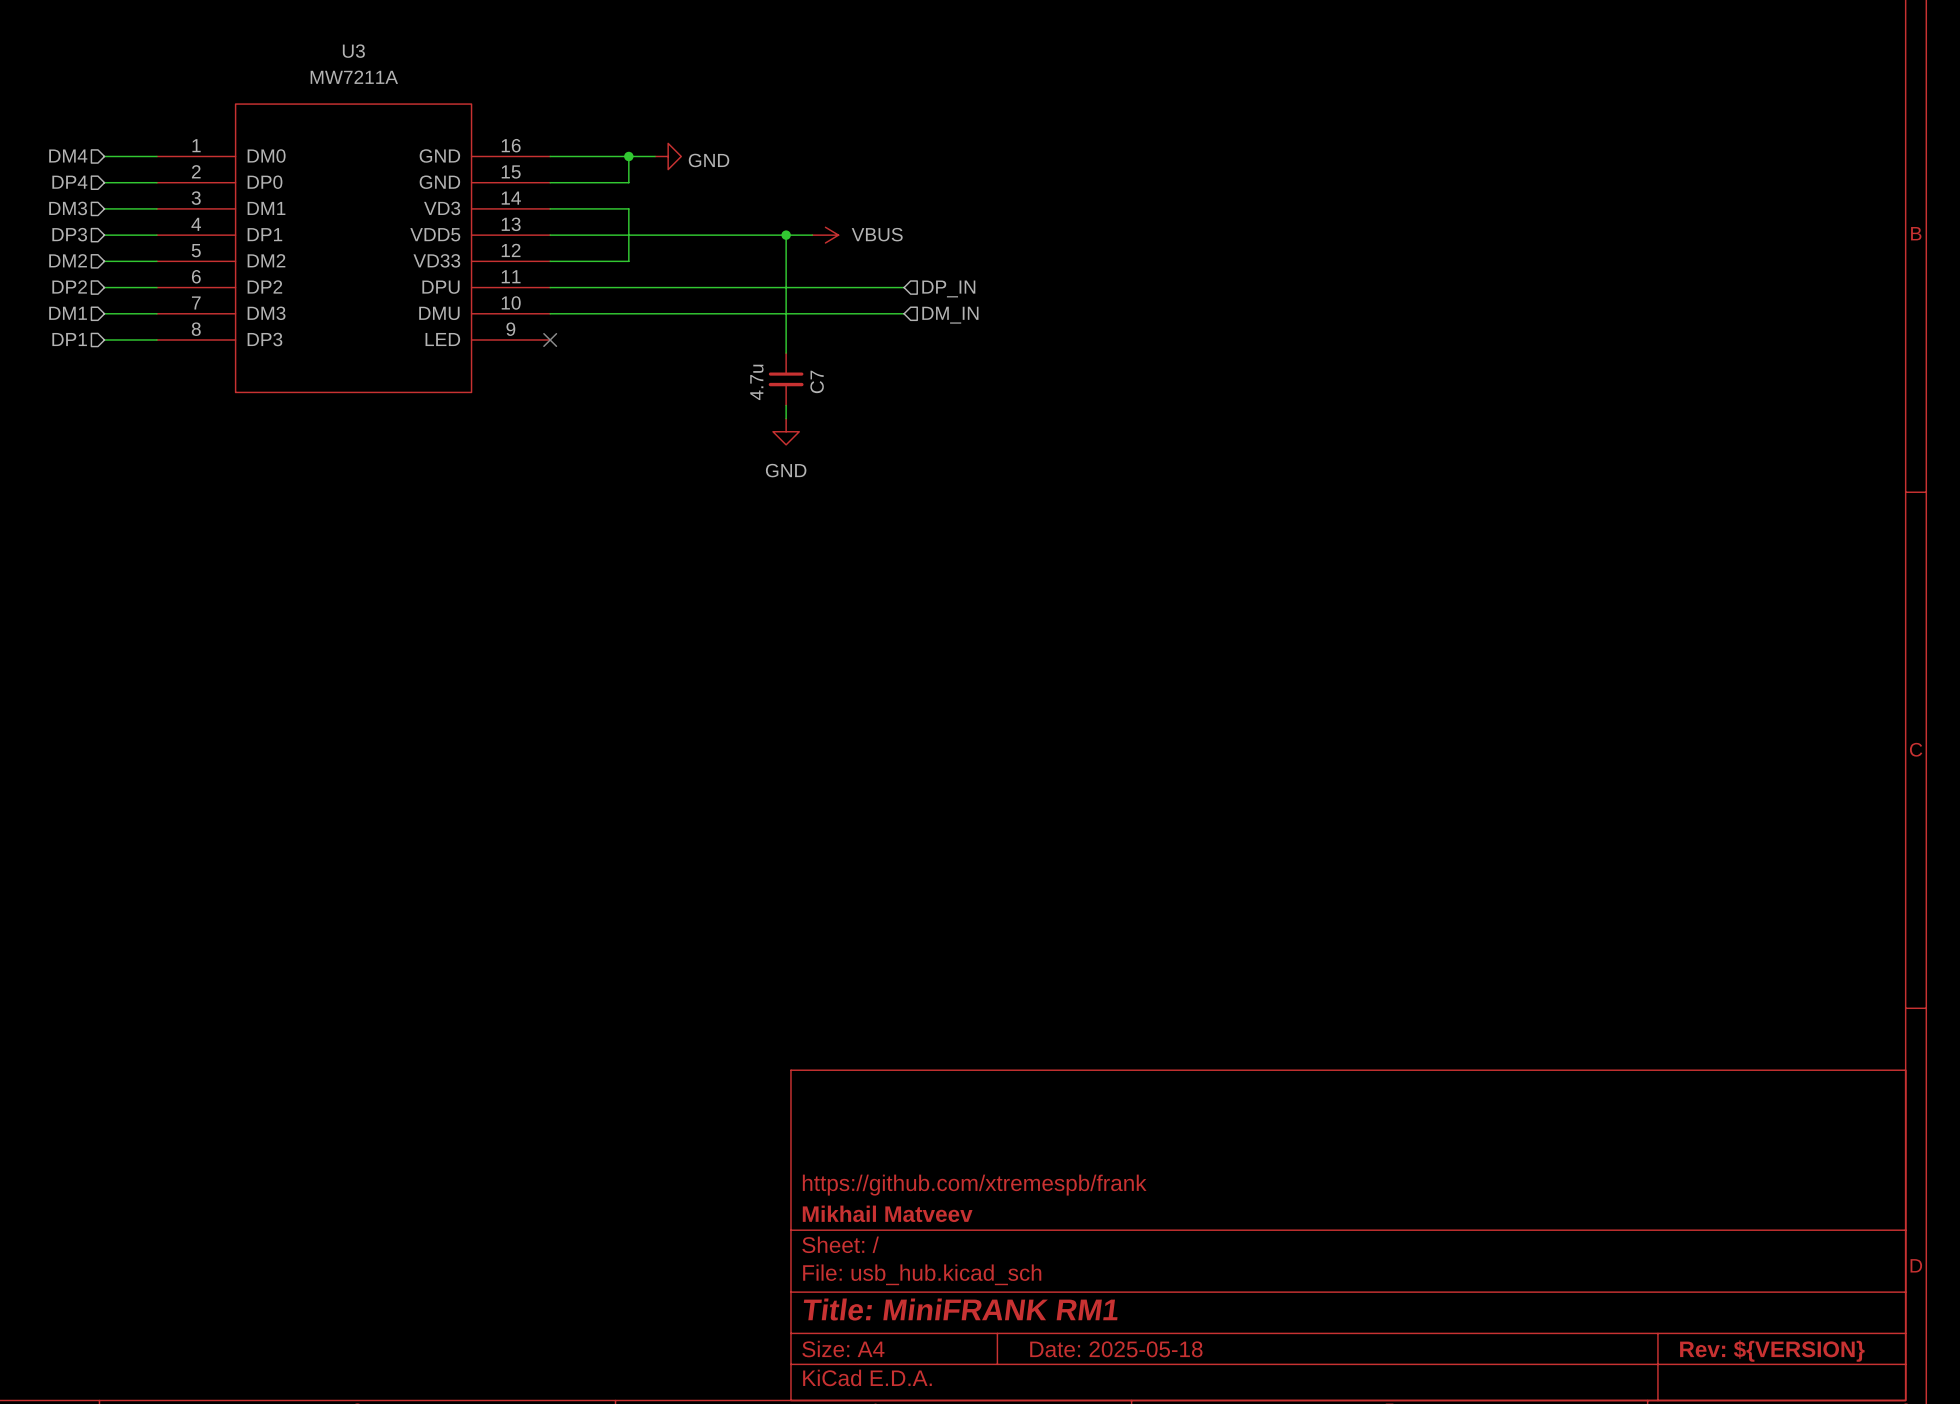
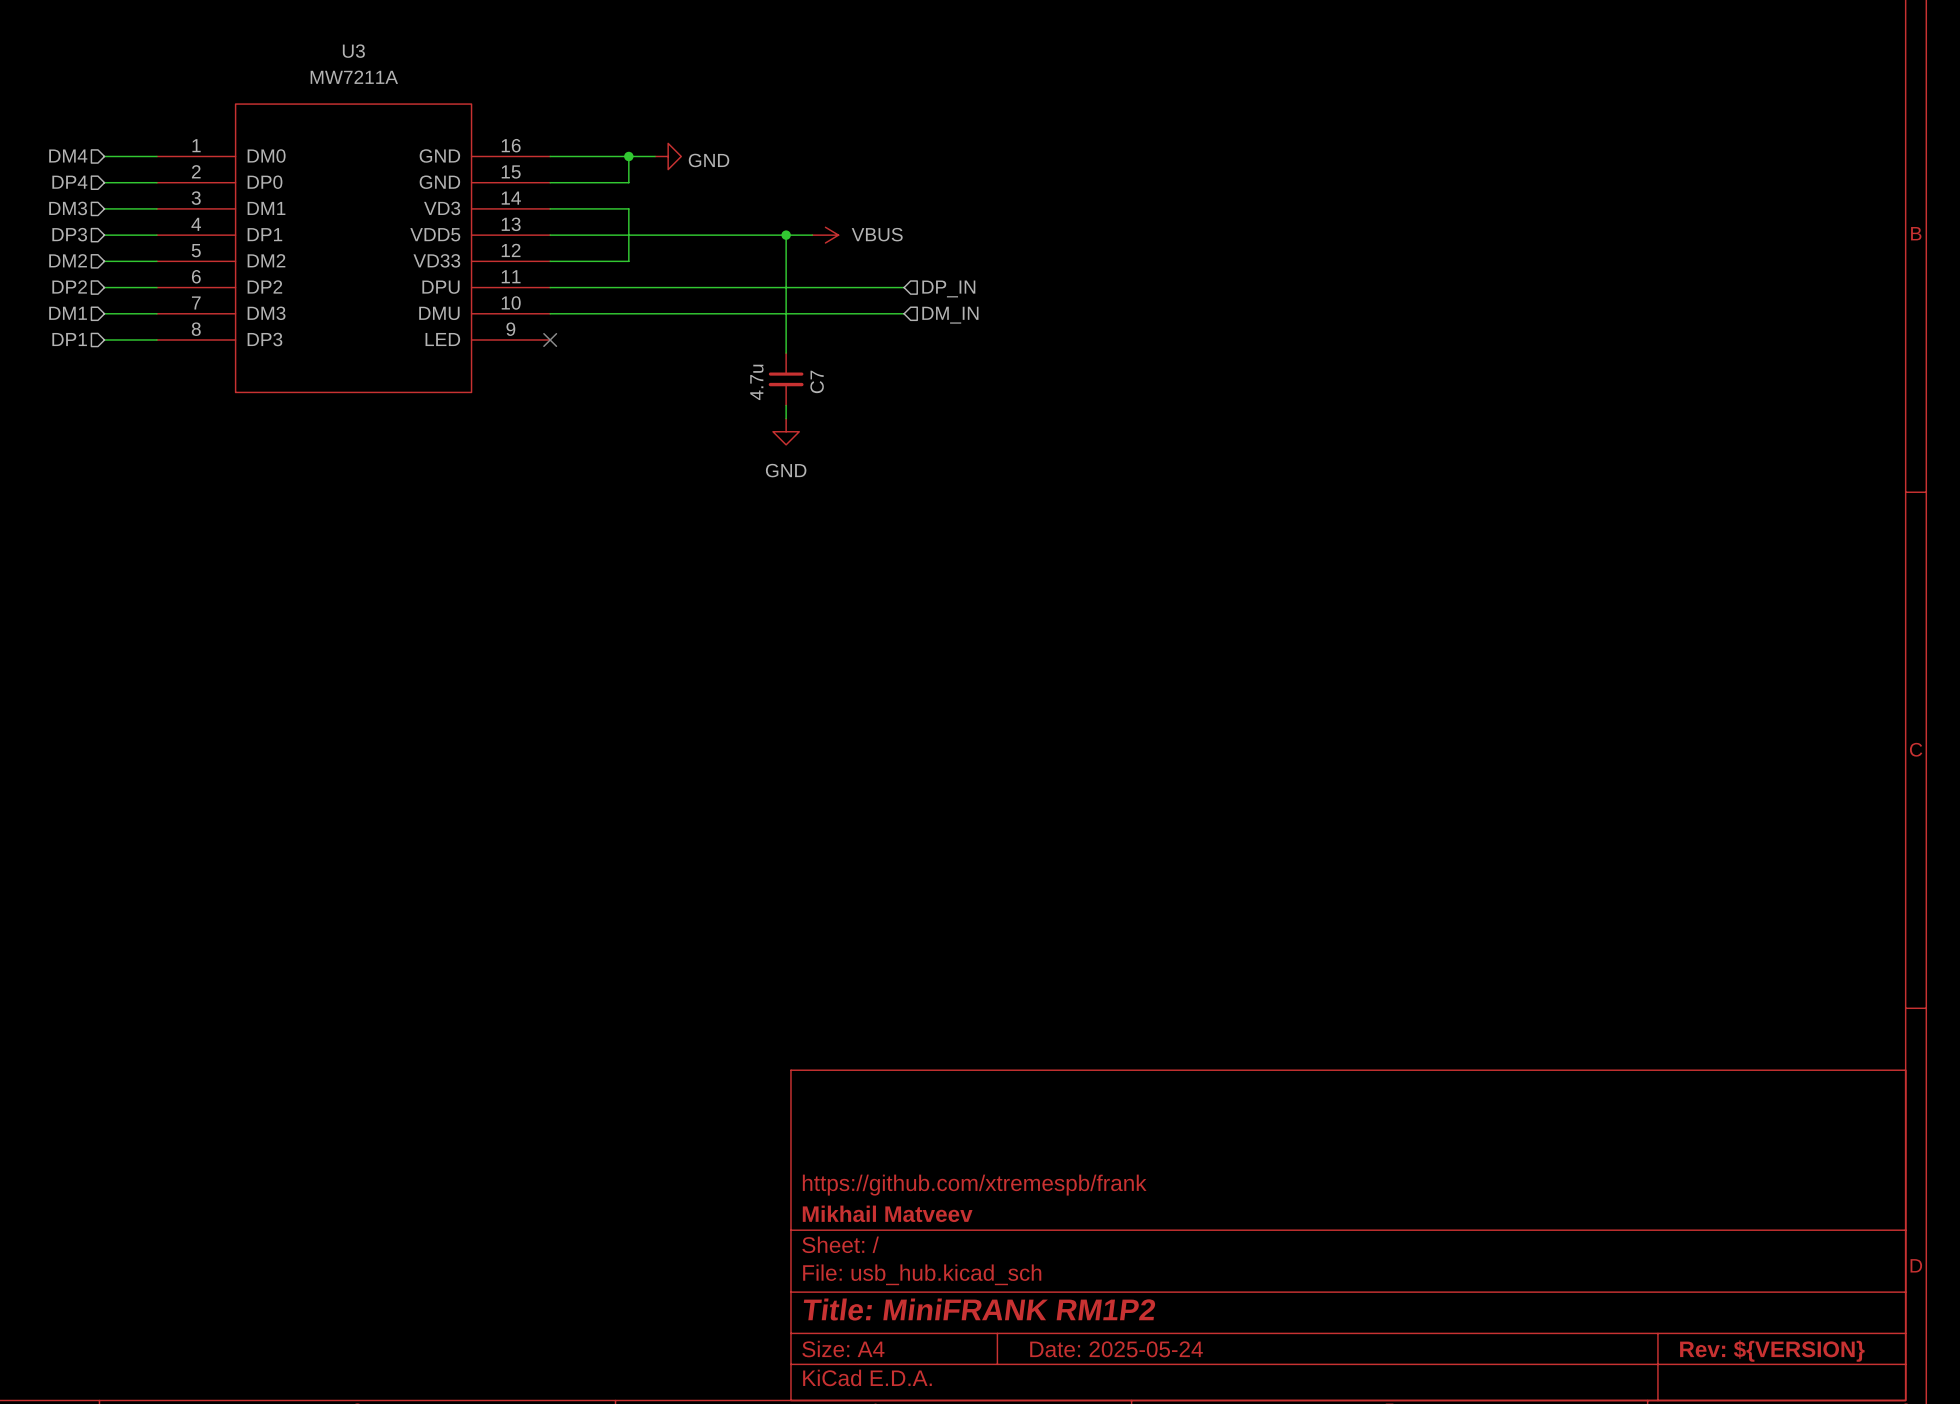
title block: Title: MiniFRANK RM1 (960, 1309) -> Title: MiniFRANK RM1P2 (979, 1309)
title block: Date: 2025-05-18 (1116, 1349) -> Date: 2025-05-24 (1116, 1349)

